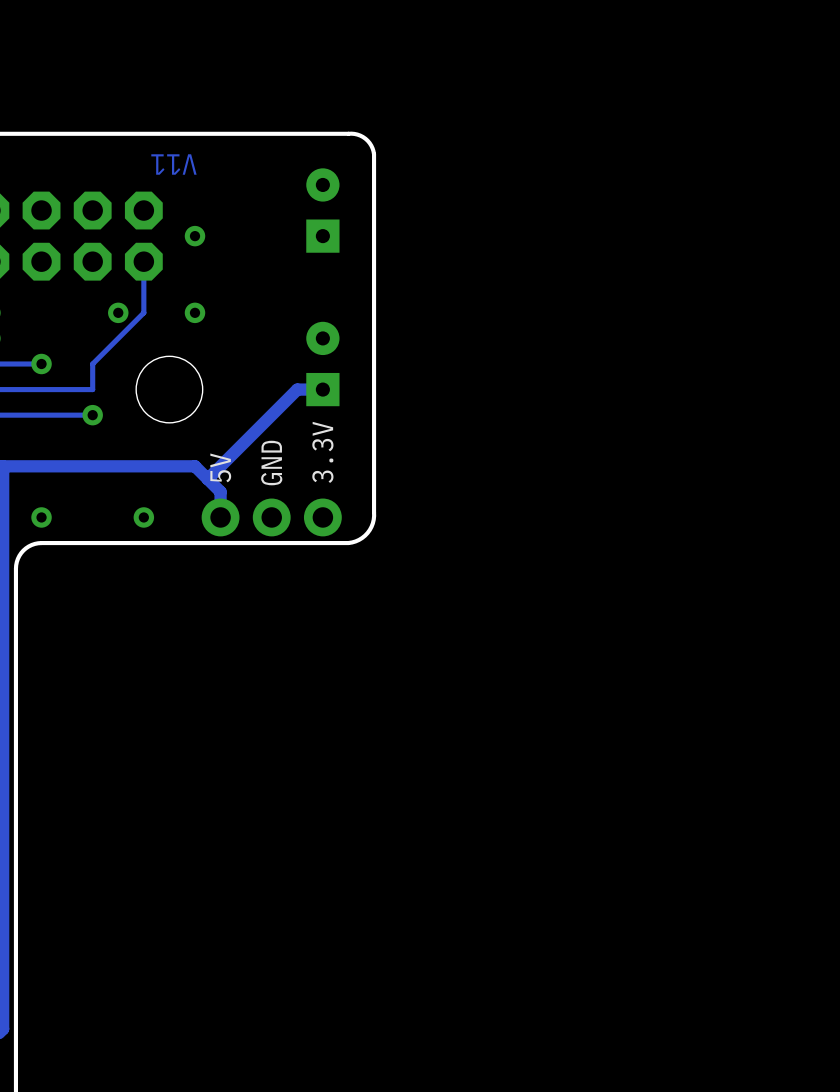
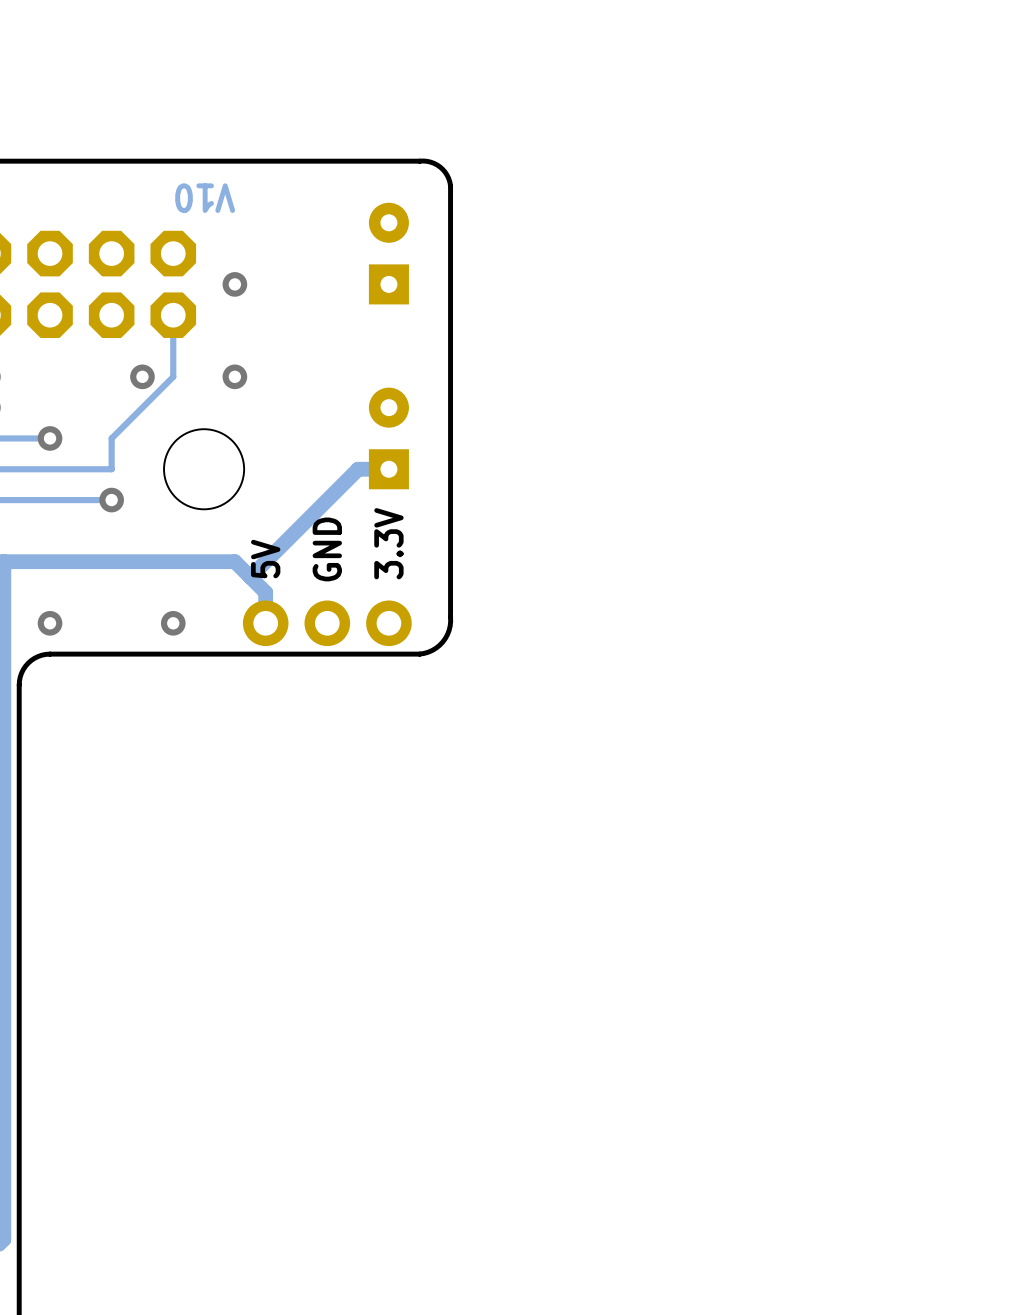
text: V11 (173, 164) -> V10 (205, 198)

